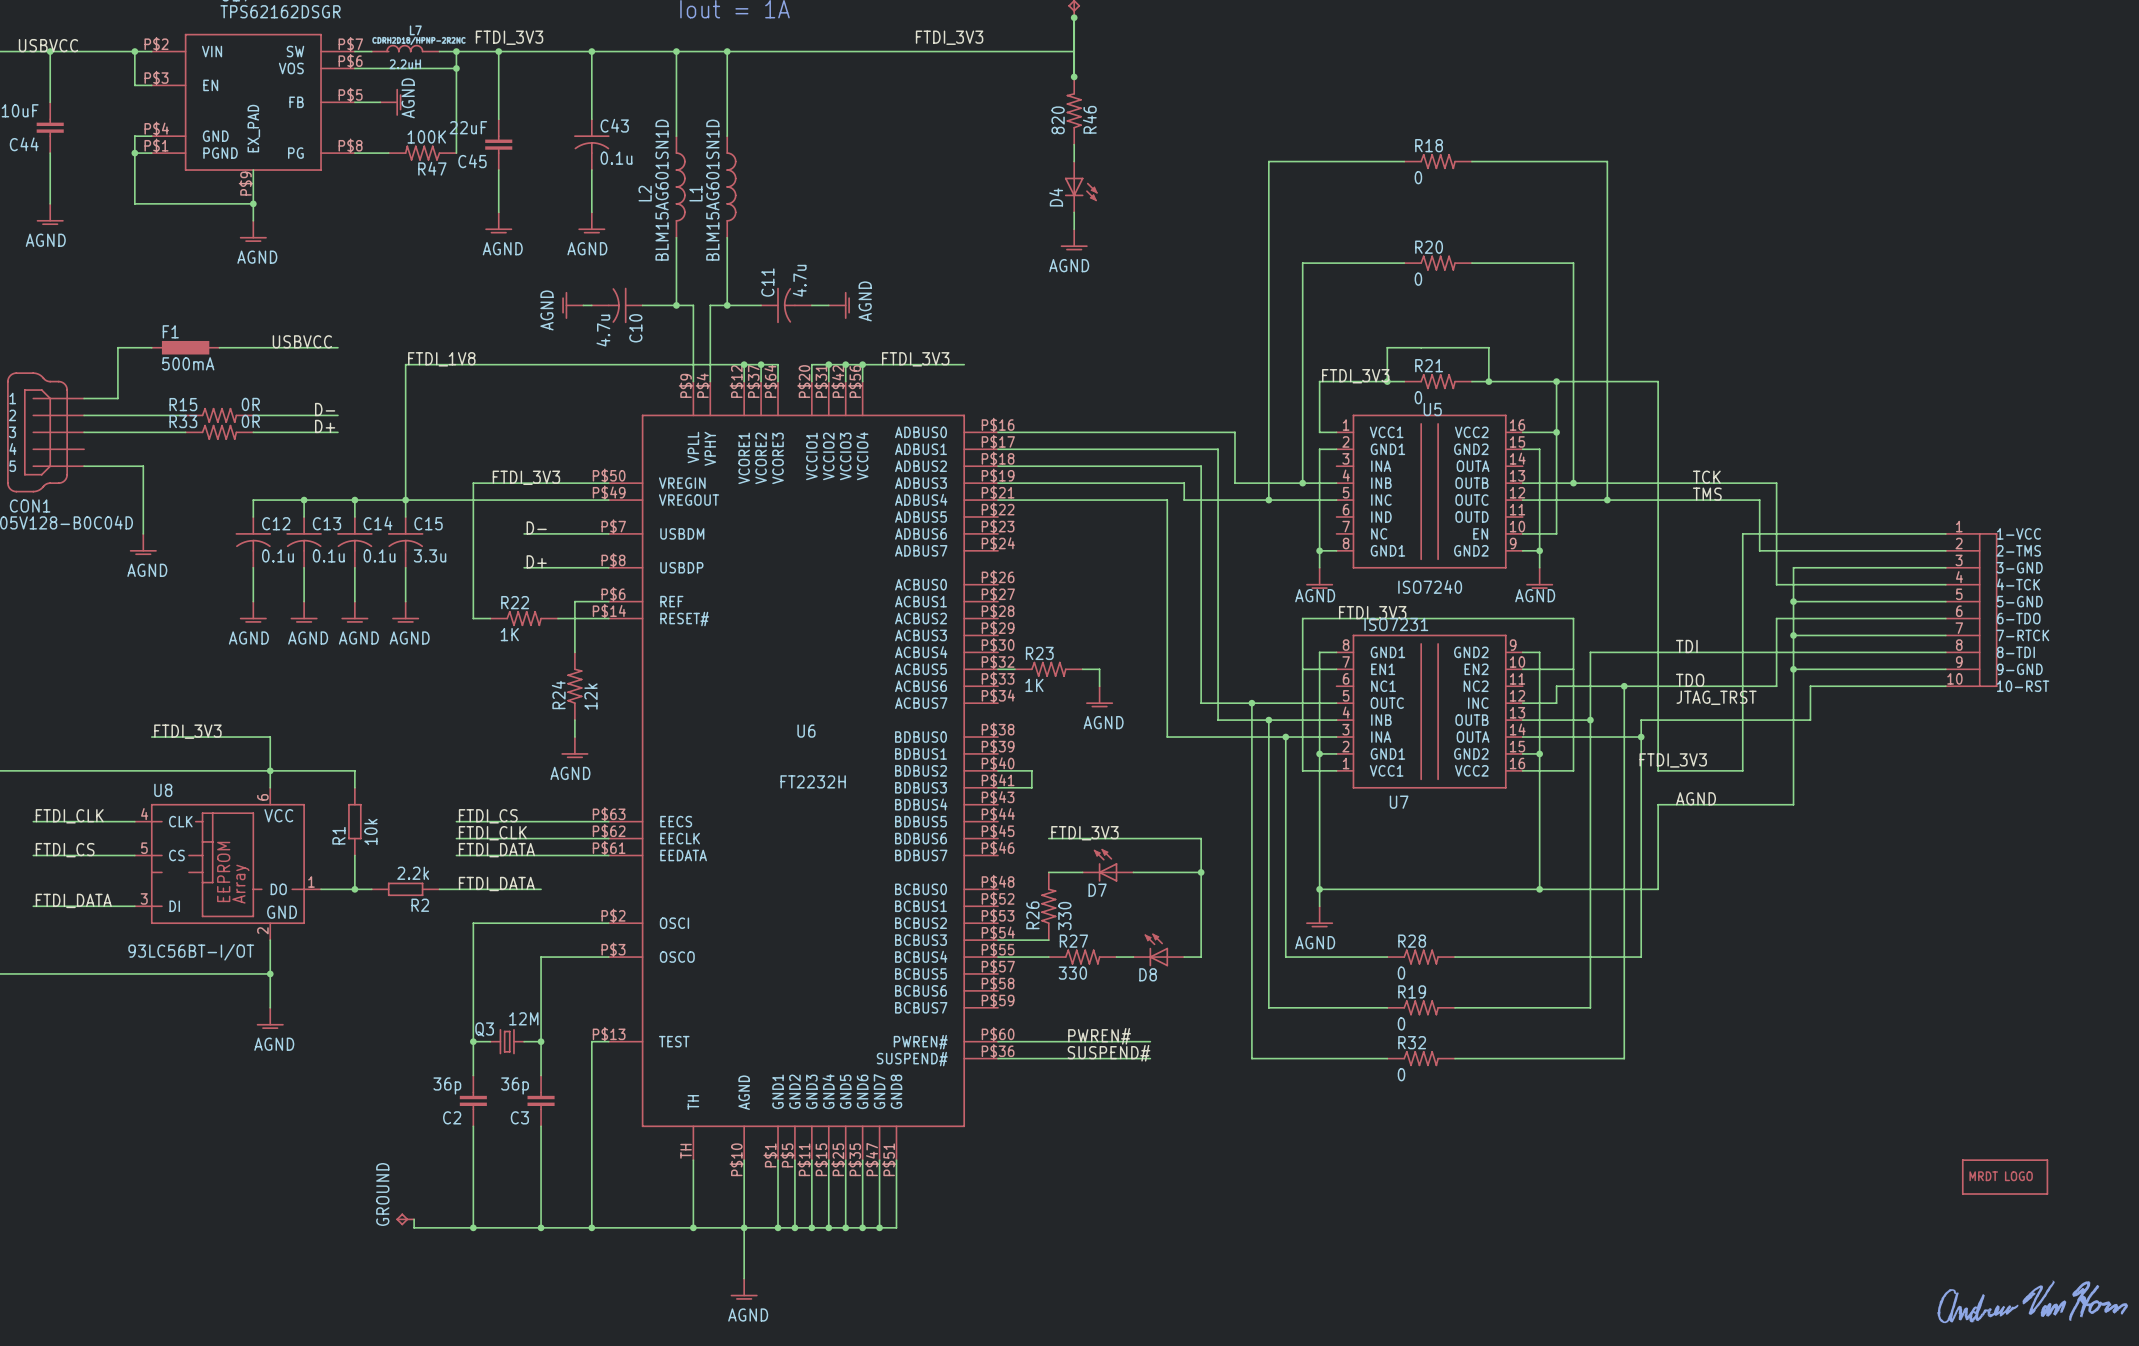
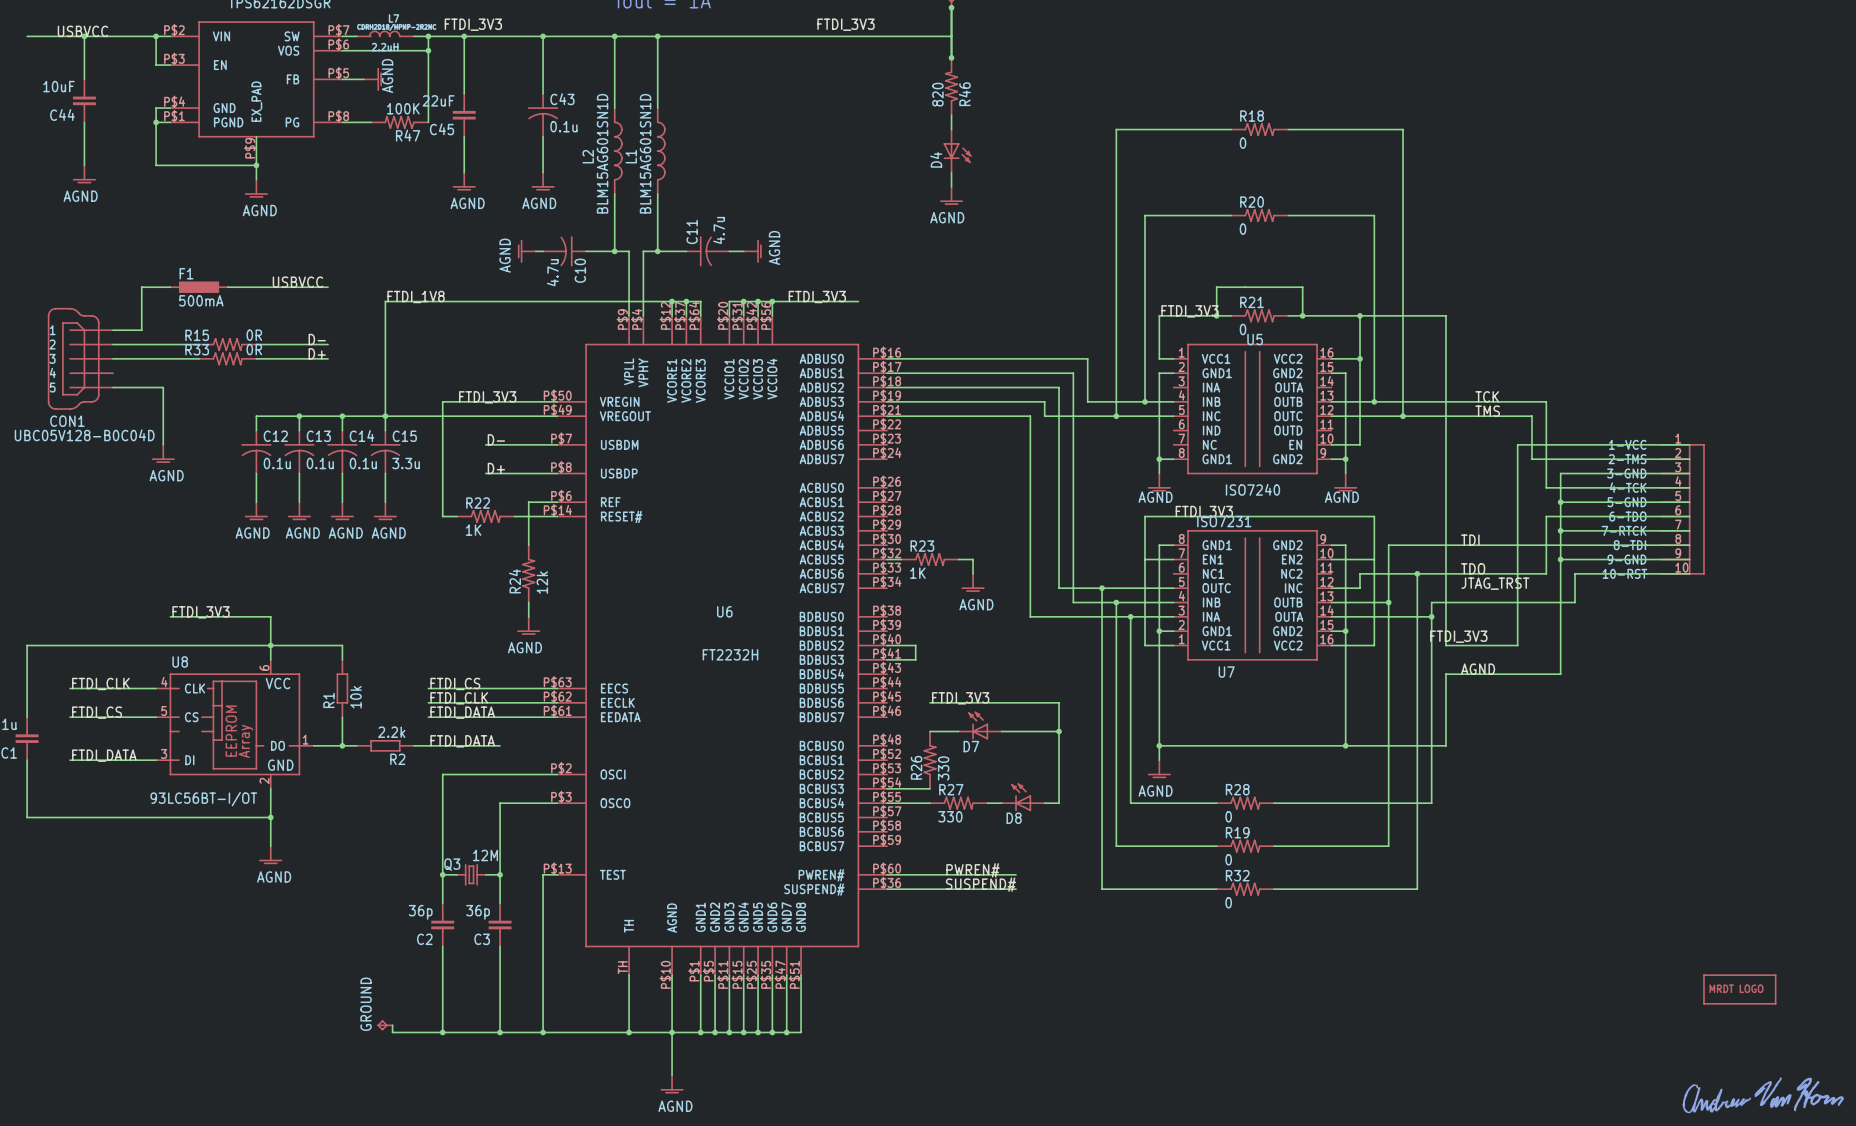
part: none -> (1682, 509)
part: (1971, 610) -> none

